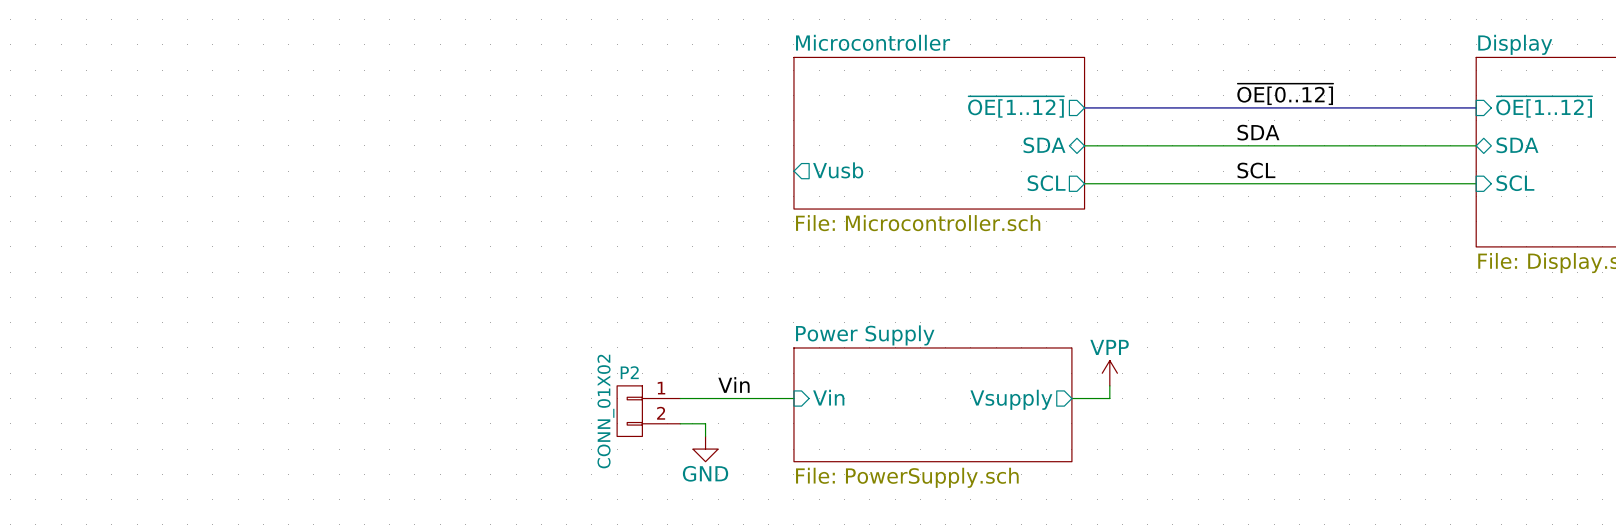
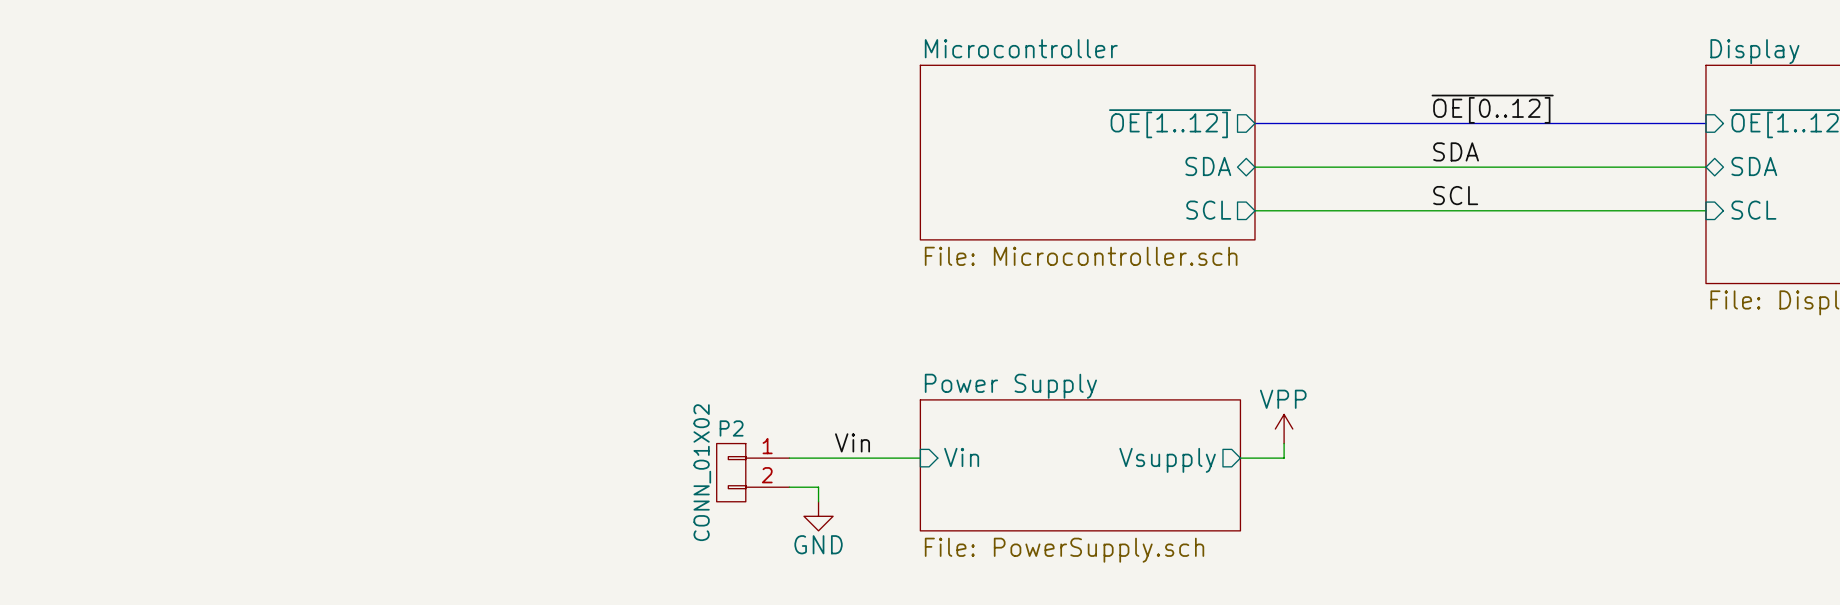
sheet pin: Vusb (838, 170) -> none

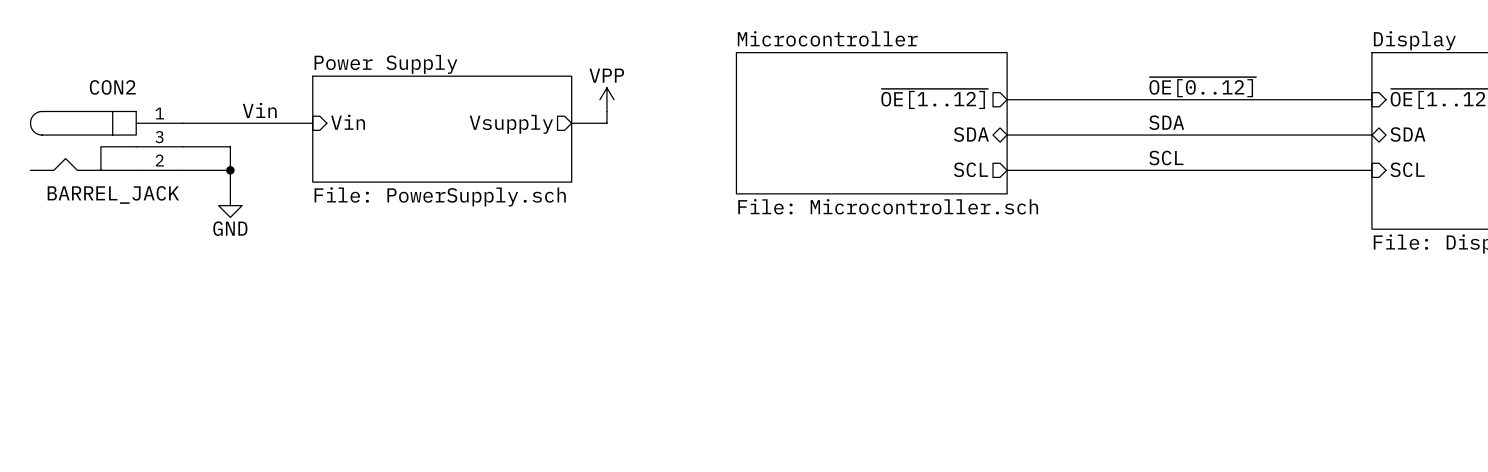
power symbol: none -> VPP (606, 99)
label: none -> Vin (259, 110)
wire: none -> (606, 111) (606, 123) (571, 123)
sheet pin: none -> Vin (348, 122)
wire: none -> (183, 123) (312, 123)
sheet pin: none -> Vsupply (511, 124)
sheet Power Supply: none -> File: PowerSupply.sch (442, 129)
CON2: none -> BARREL_JACK (106, 140)
wire: none -> (183, 146) (230, 146) (230, 193)
wire: none -> (183, 170) (230, 170)
junction: none -> (230, 170)
power symbol: none -> GND (230, 205)
power symbol: VPP (1284, 429) -> none
label: Vin (852, 442) -> none
wire: (1284, 443) (1284, 458) (1240, 458) -> none
sheet pin: Vin (961, 457) -> none
wire: (789, 458) (920, 458) -> none
sheet pin: Vsupply (1167, 460) -> none
sheet Power Supply: File: PowerSupply.sch (1080, 465) -> none
P2: CONN_01X02 (753, 472) -> none
wire: (789, 487) (818, 487) (818, 501) -> none
power symbol: GND (818, 516) -> none

